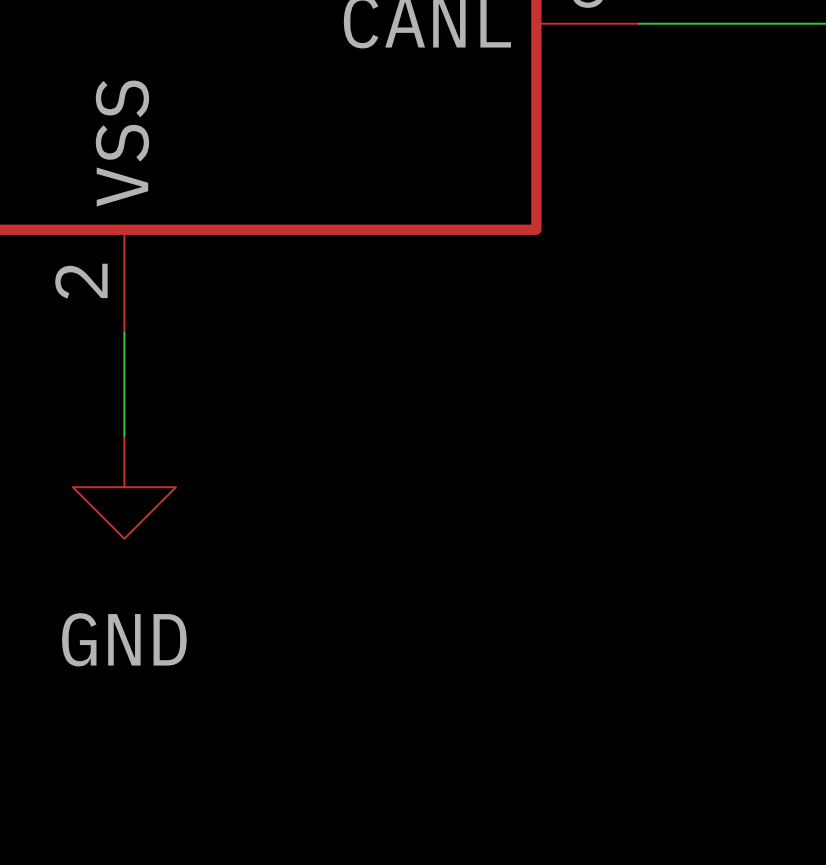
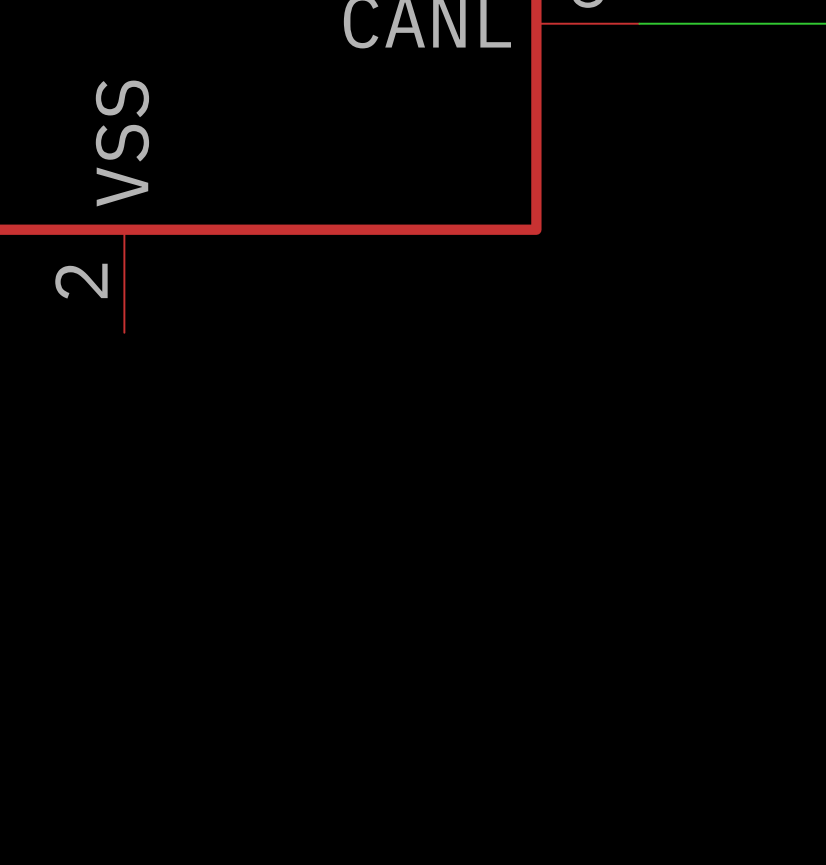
wire: (124, 332) (124, 435) -> none
power symbol: GND (124, 487) -> none

